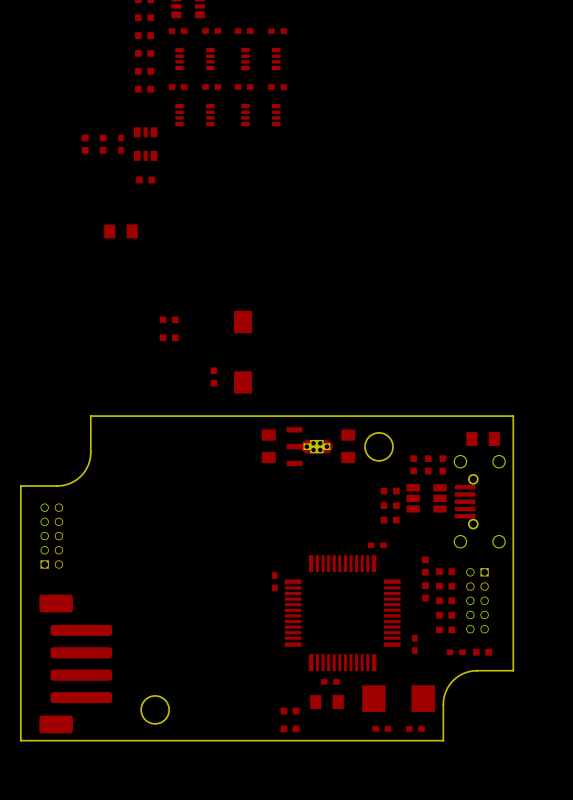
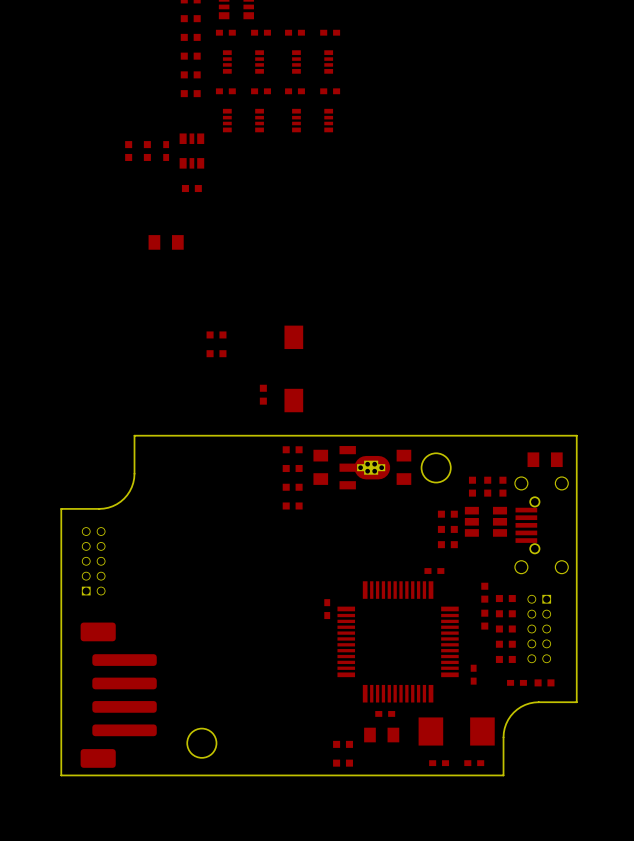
part footprint: [286, 427, 333, 467] -> [339, 446, 391, 490]
part: none -> (292, 449)
part: none -> (292, 468)
part: none -> (292, 487)
part: none -> (292, 505)

